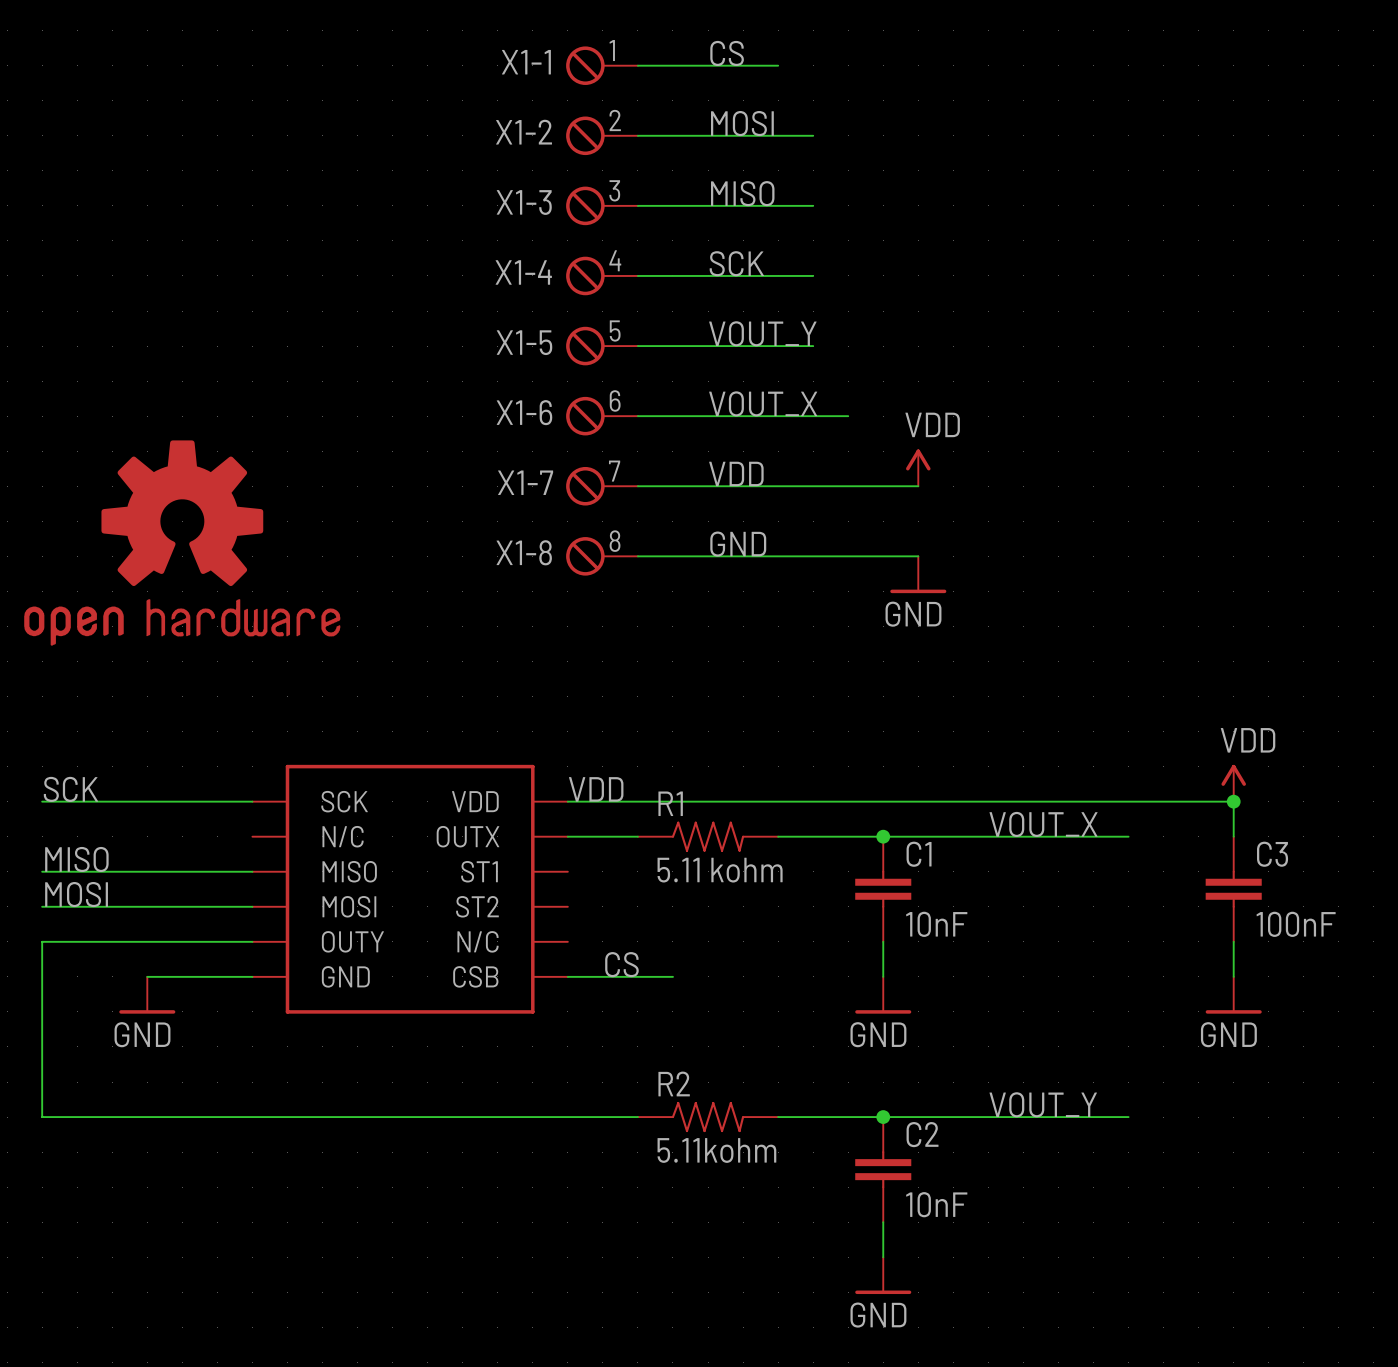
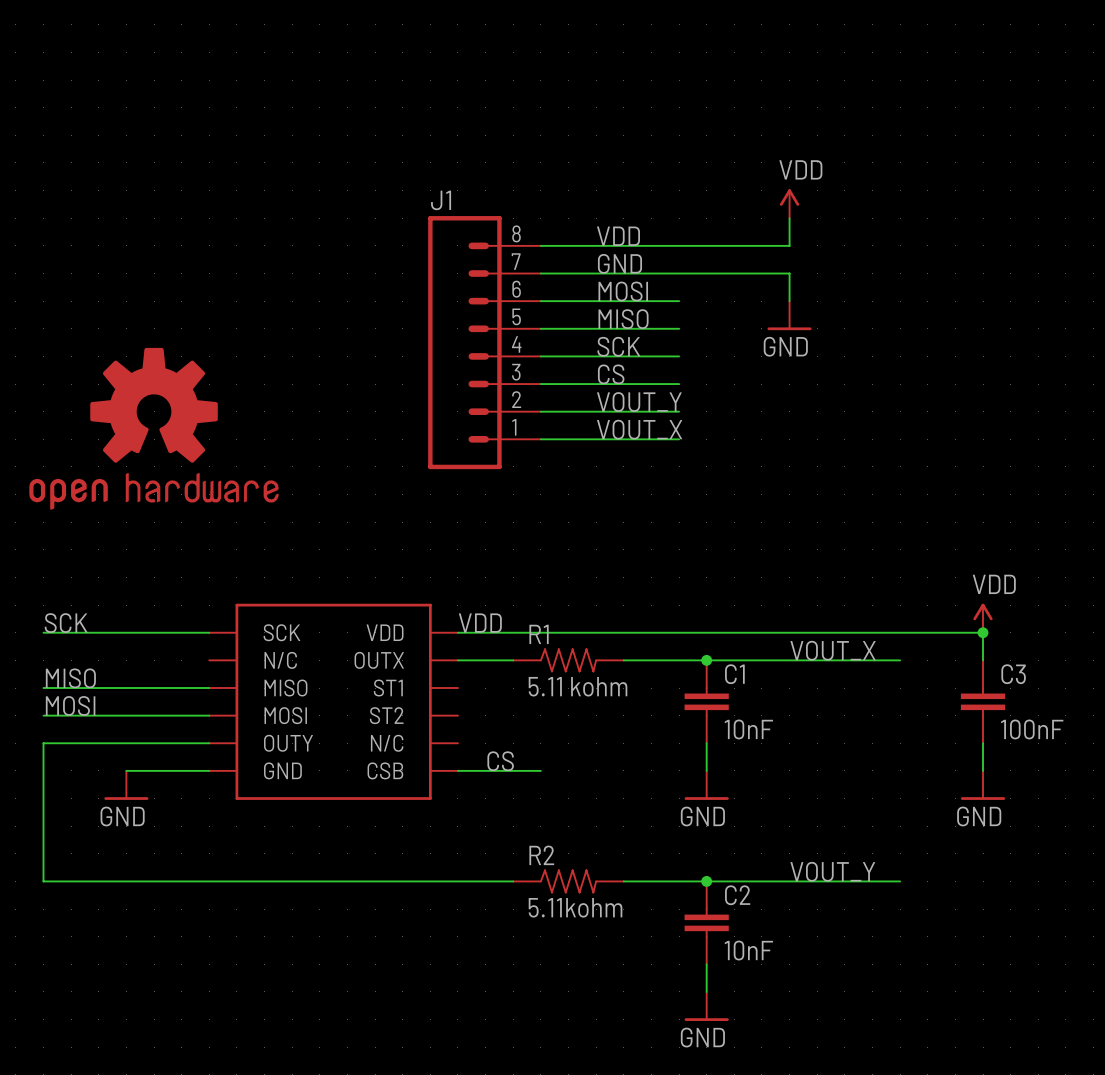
label: CS (727, 53) -> none
X1-1: (602, 65) -> none
wire: (637, 65) (778, 65) -> none
label position: MOSI (742, 123) -> MOSI (623, 291)
X1-2: (602, 135) -> none
wire: (637, 135) (813, 135) -> (540, 301) (679, 301)
label position: MISO (742, 193) -> MISO (623, 319)
X1-3: (602, 205) -> none
wire: (637, 205) (813, 205) -> (540, 356) (679, 356)
label position: SCK (736, 263) -> SCK (618, 346)
X1-4: (602, 275) -> none
wire: (637, 275) (813, 275) -> (540, 411) (679, 411)
wire: none -> (789, 218) (789, 245) (540, 245)
label position: VOUT_Y (762, 333) -> VOUT_Y (639, 402)
X1-5: (602, 346) -> none
wire: none -> (651, 273) (789, 273) (789, 301)
label position: VOUT_X (763, 403) -> VOUT_X (639, 429)
X1-6: (602, 416) -> none
J1: none -> (484, 342)
power symbol position: VDD (918, 467) -> VDD (789, 203)
label position: VDD (736, 473) -> VDD (618, 236)
label: none -> CS (611, 374)
X1-7: (602, 486) -> none
wire: (848, 486) (918, 486) -> none
label position: GND (738, 544) -> GND (619, 263)
X1-8: (602, 556) -> none
wire: (848, 556) (918, 556) -> none
power symbol position: GND (918, 574) -> GND (789, 315)

